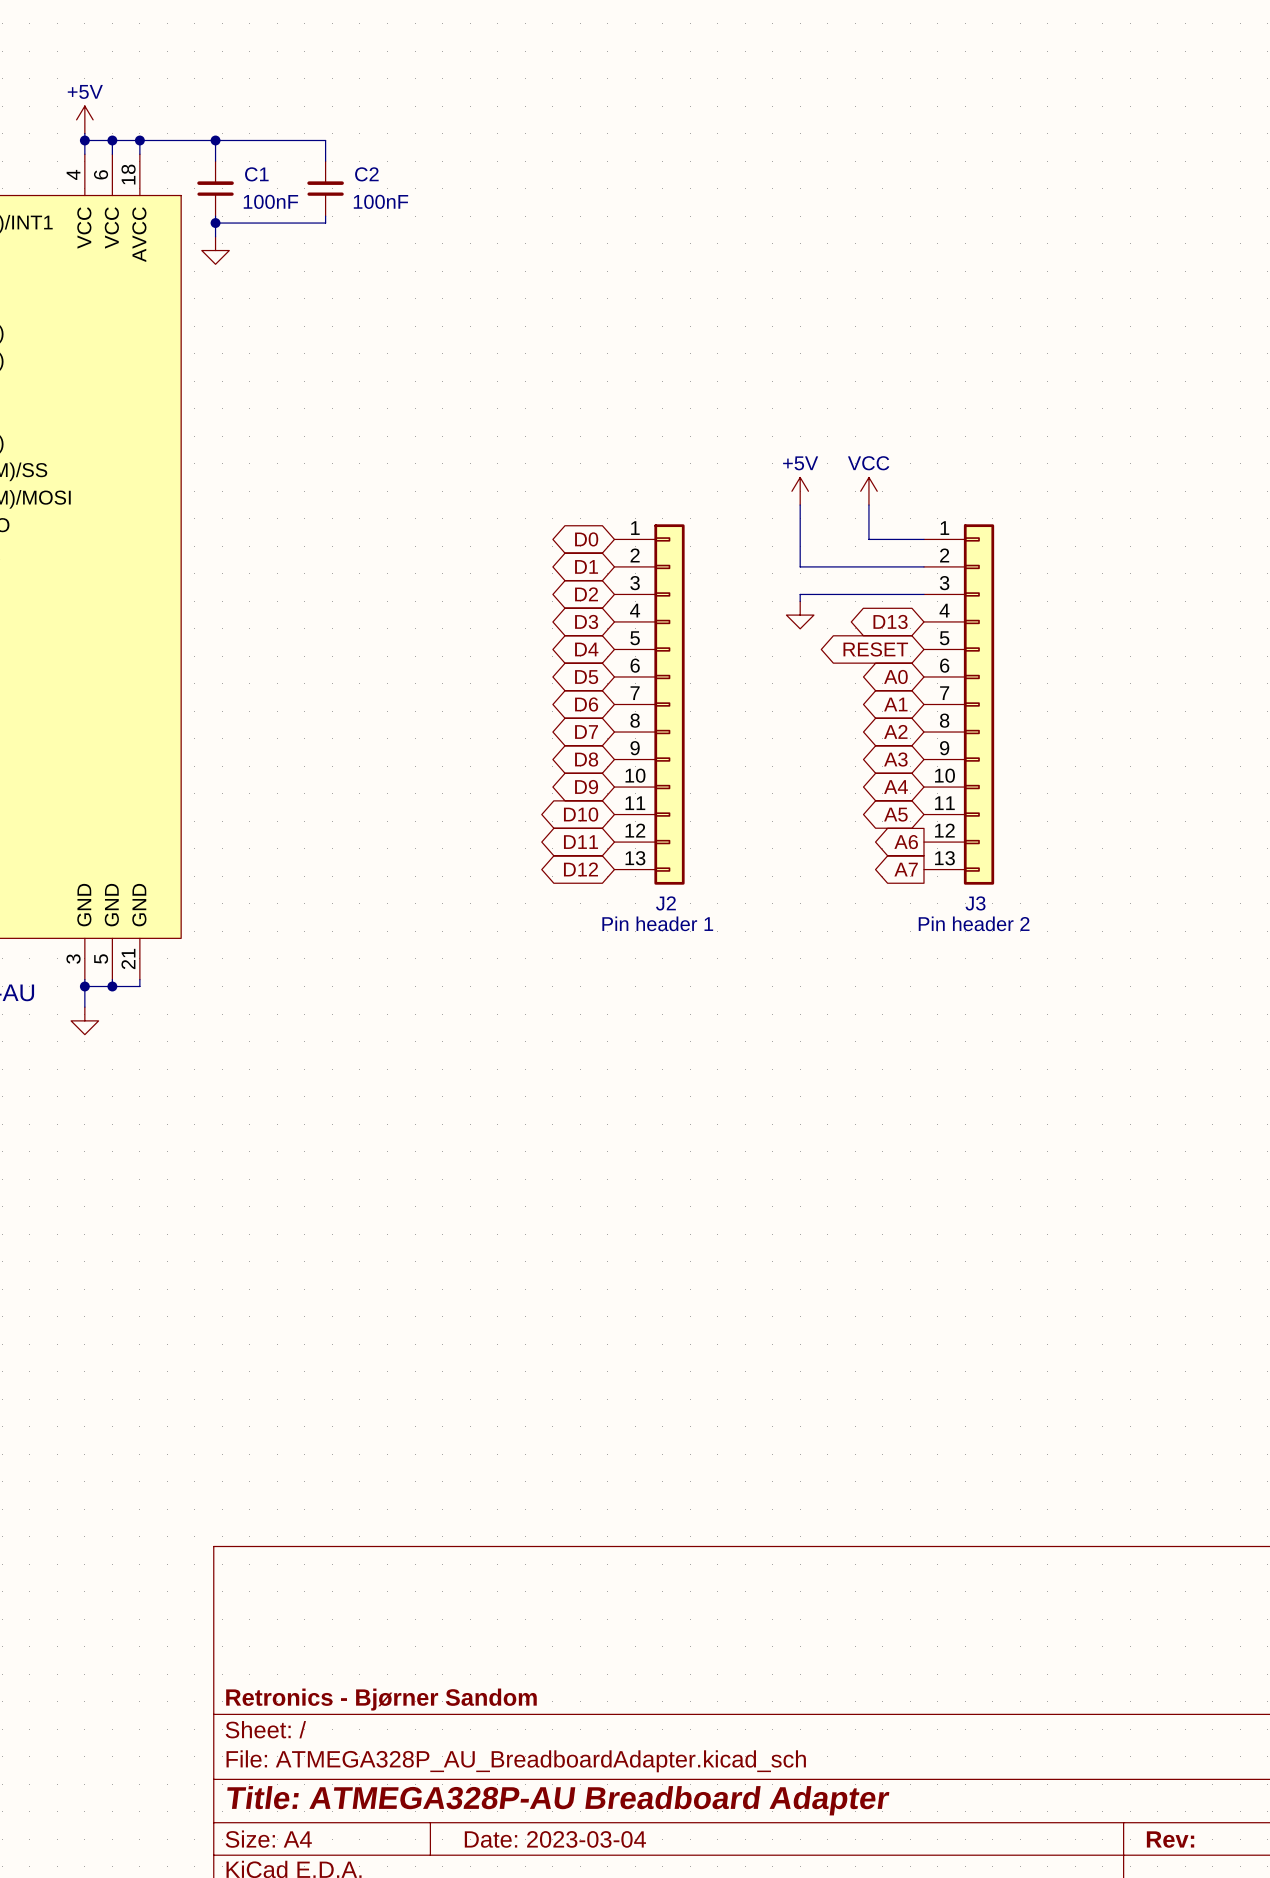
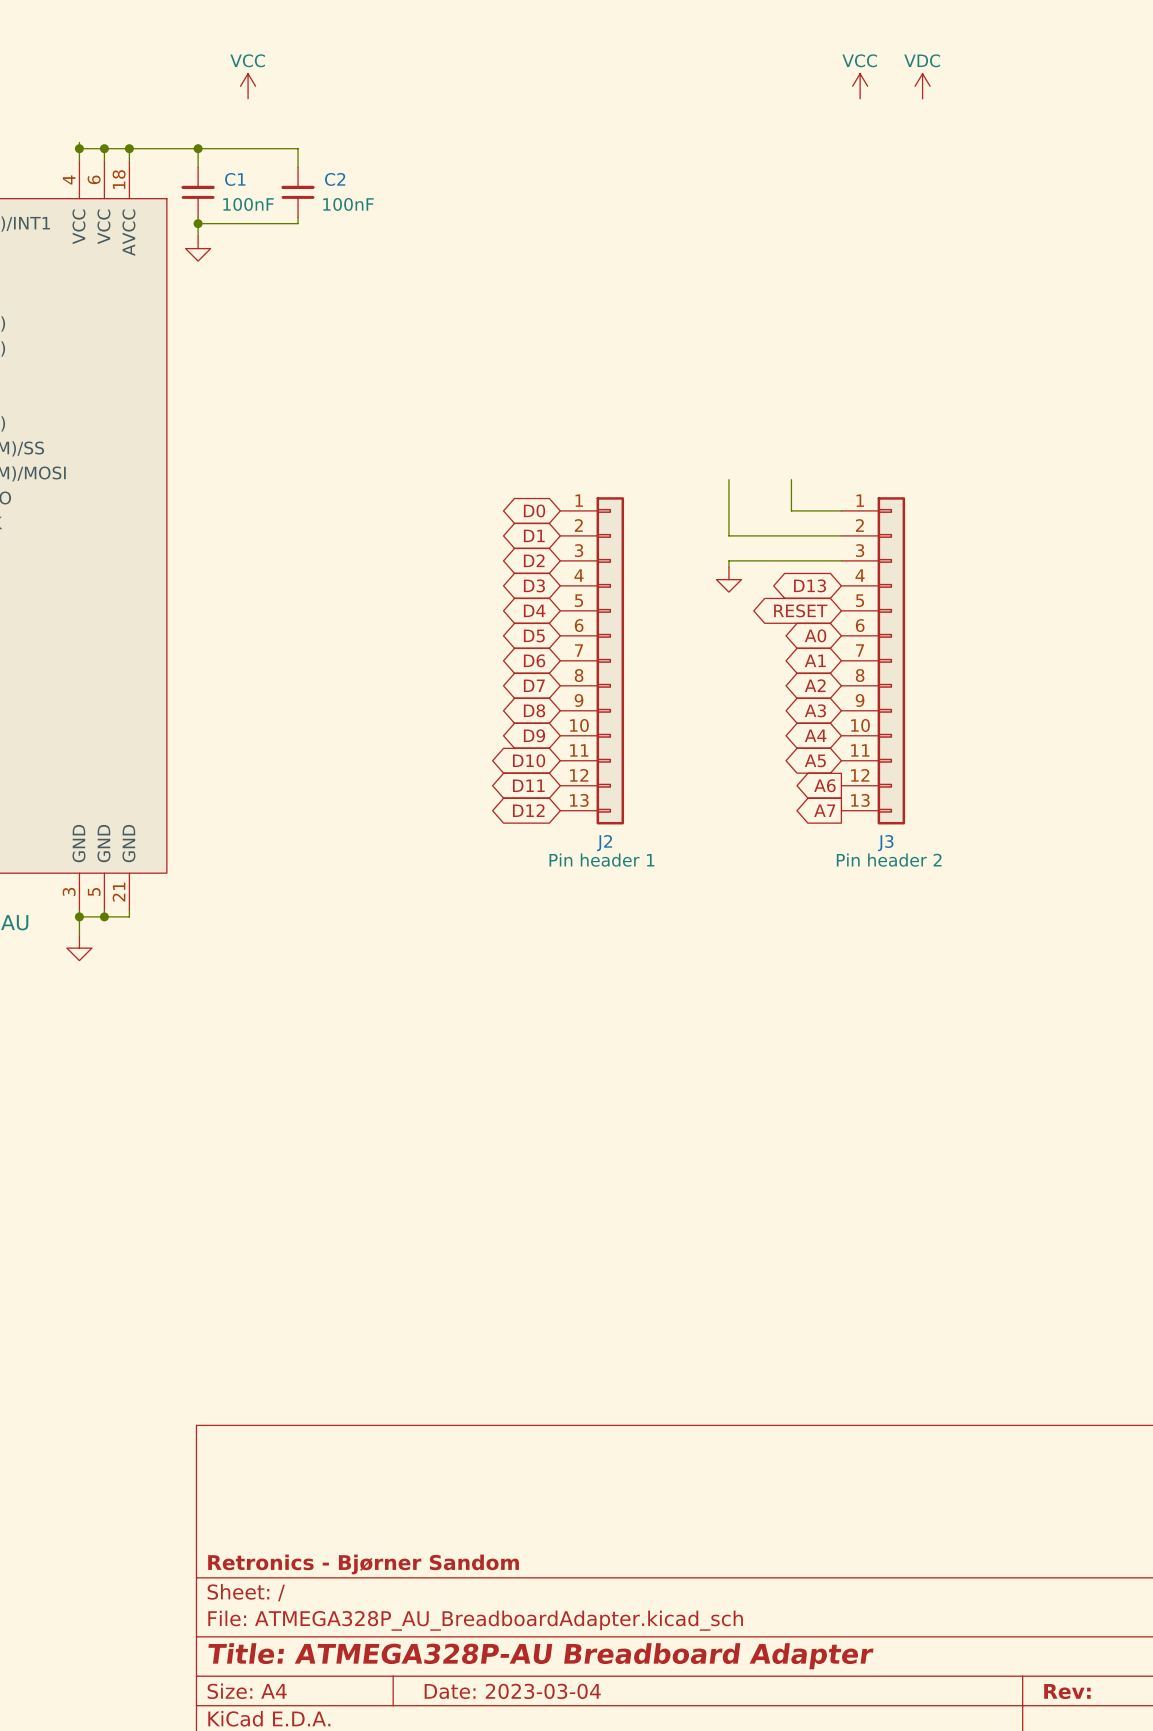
power symbol: none -> VCC (248, 86)
power symbol: none -> VCC (860, 86)
power symbol: none -> VDC (922, 86)
power symbol: +5V (84, 119) -> none
power symbol: +5V (800, 491) -> none
power symbol: VCC (868, 491) -> none

